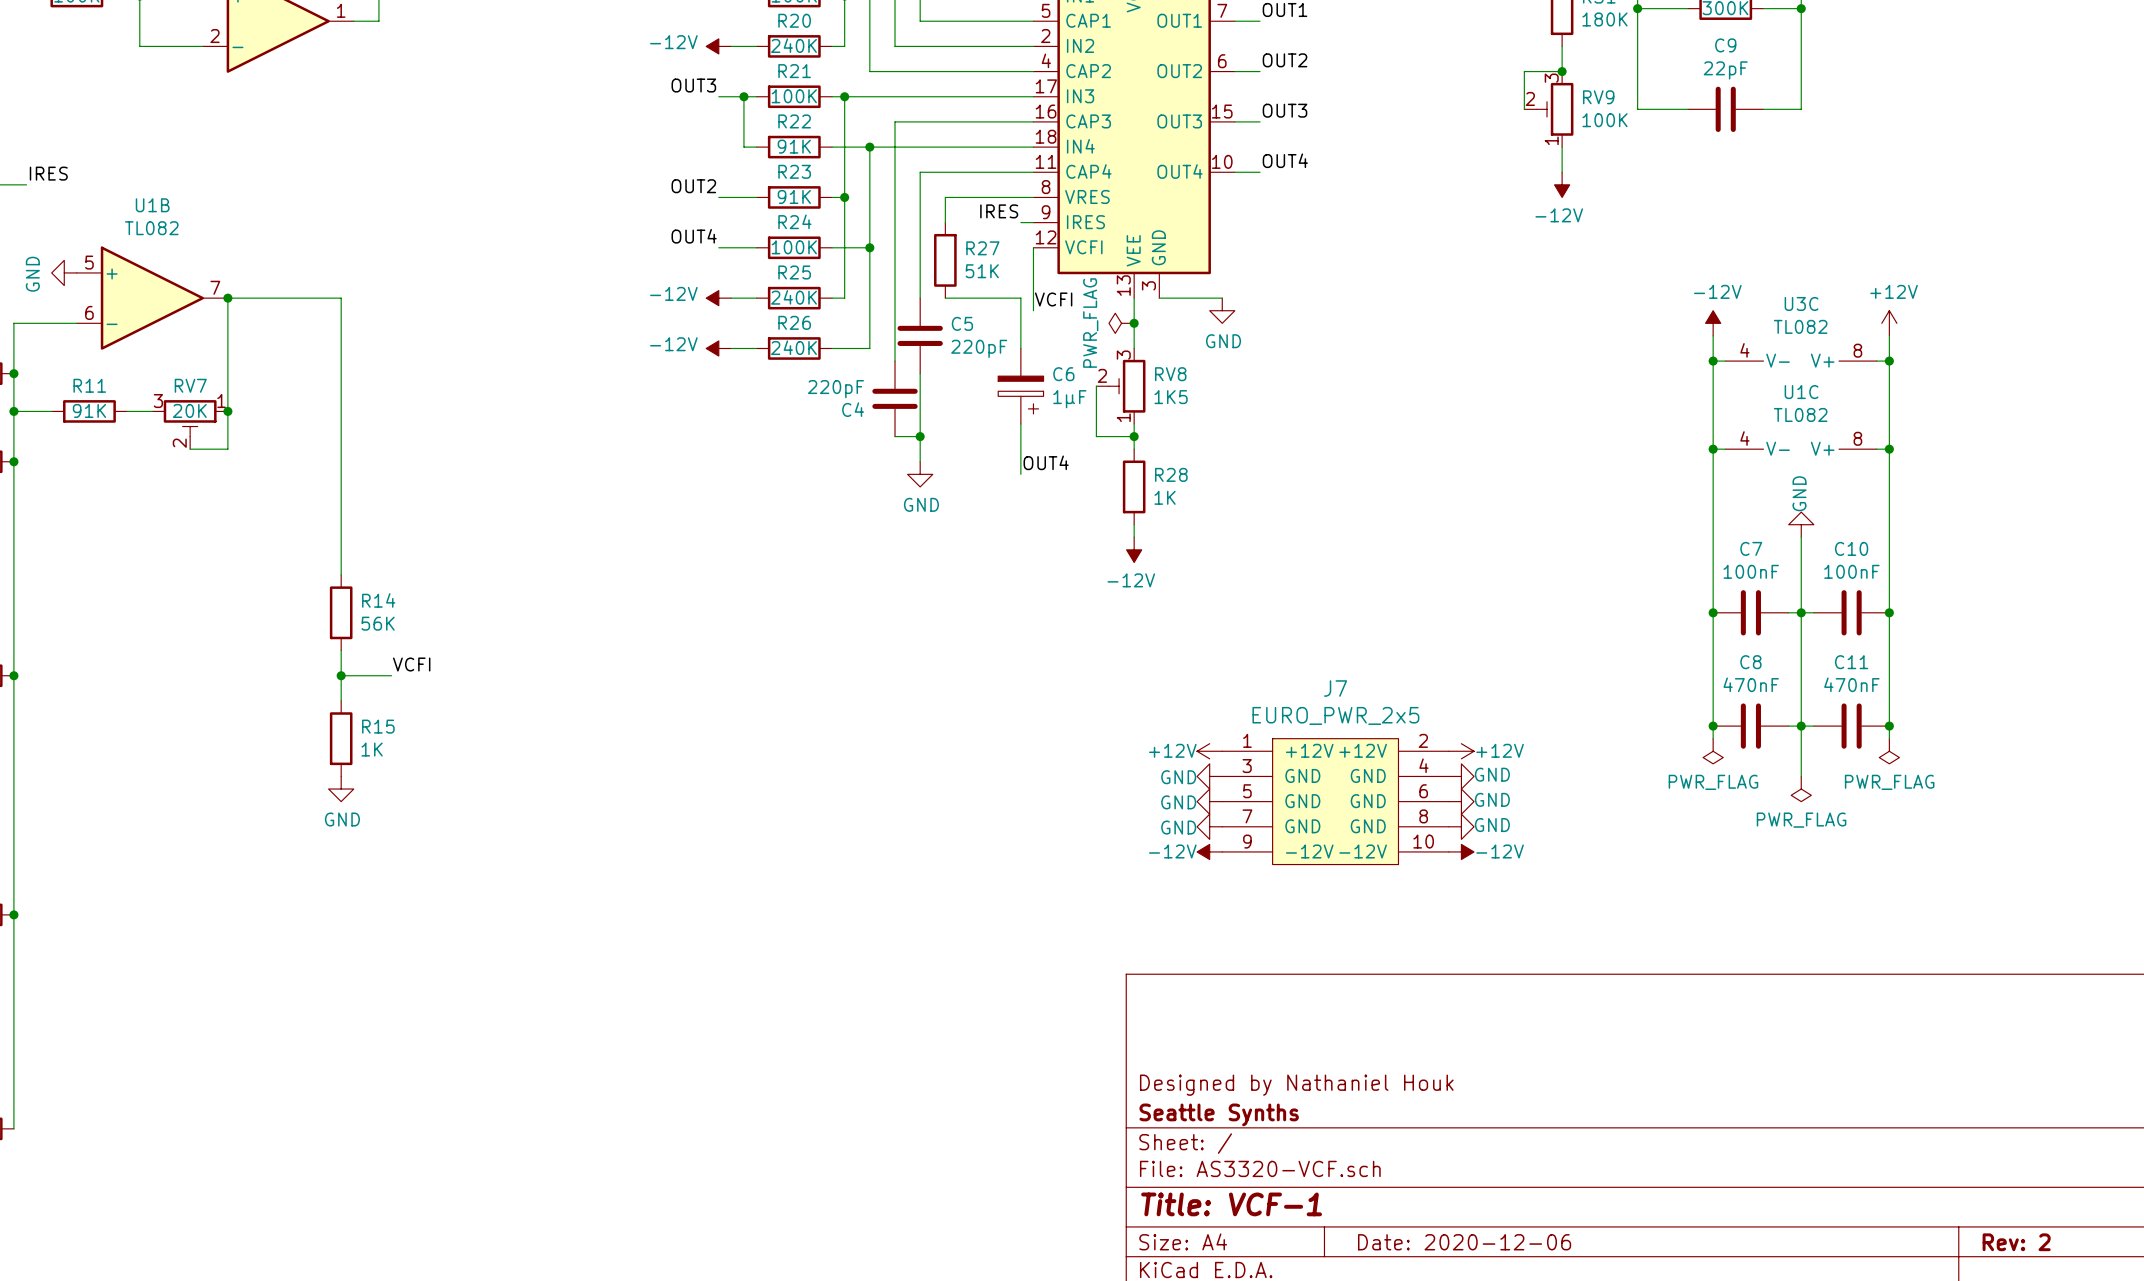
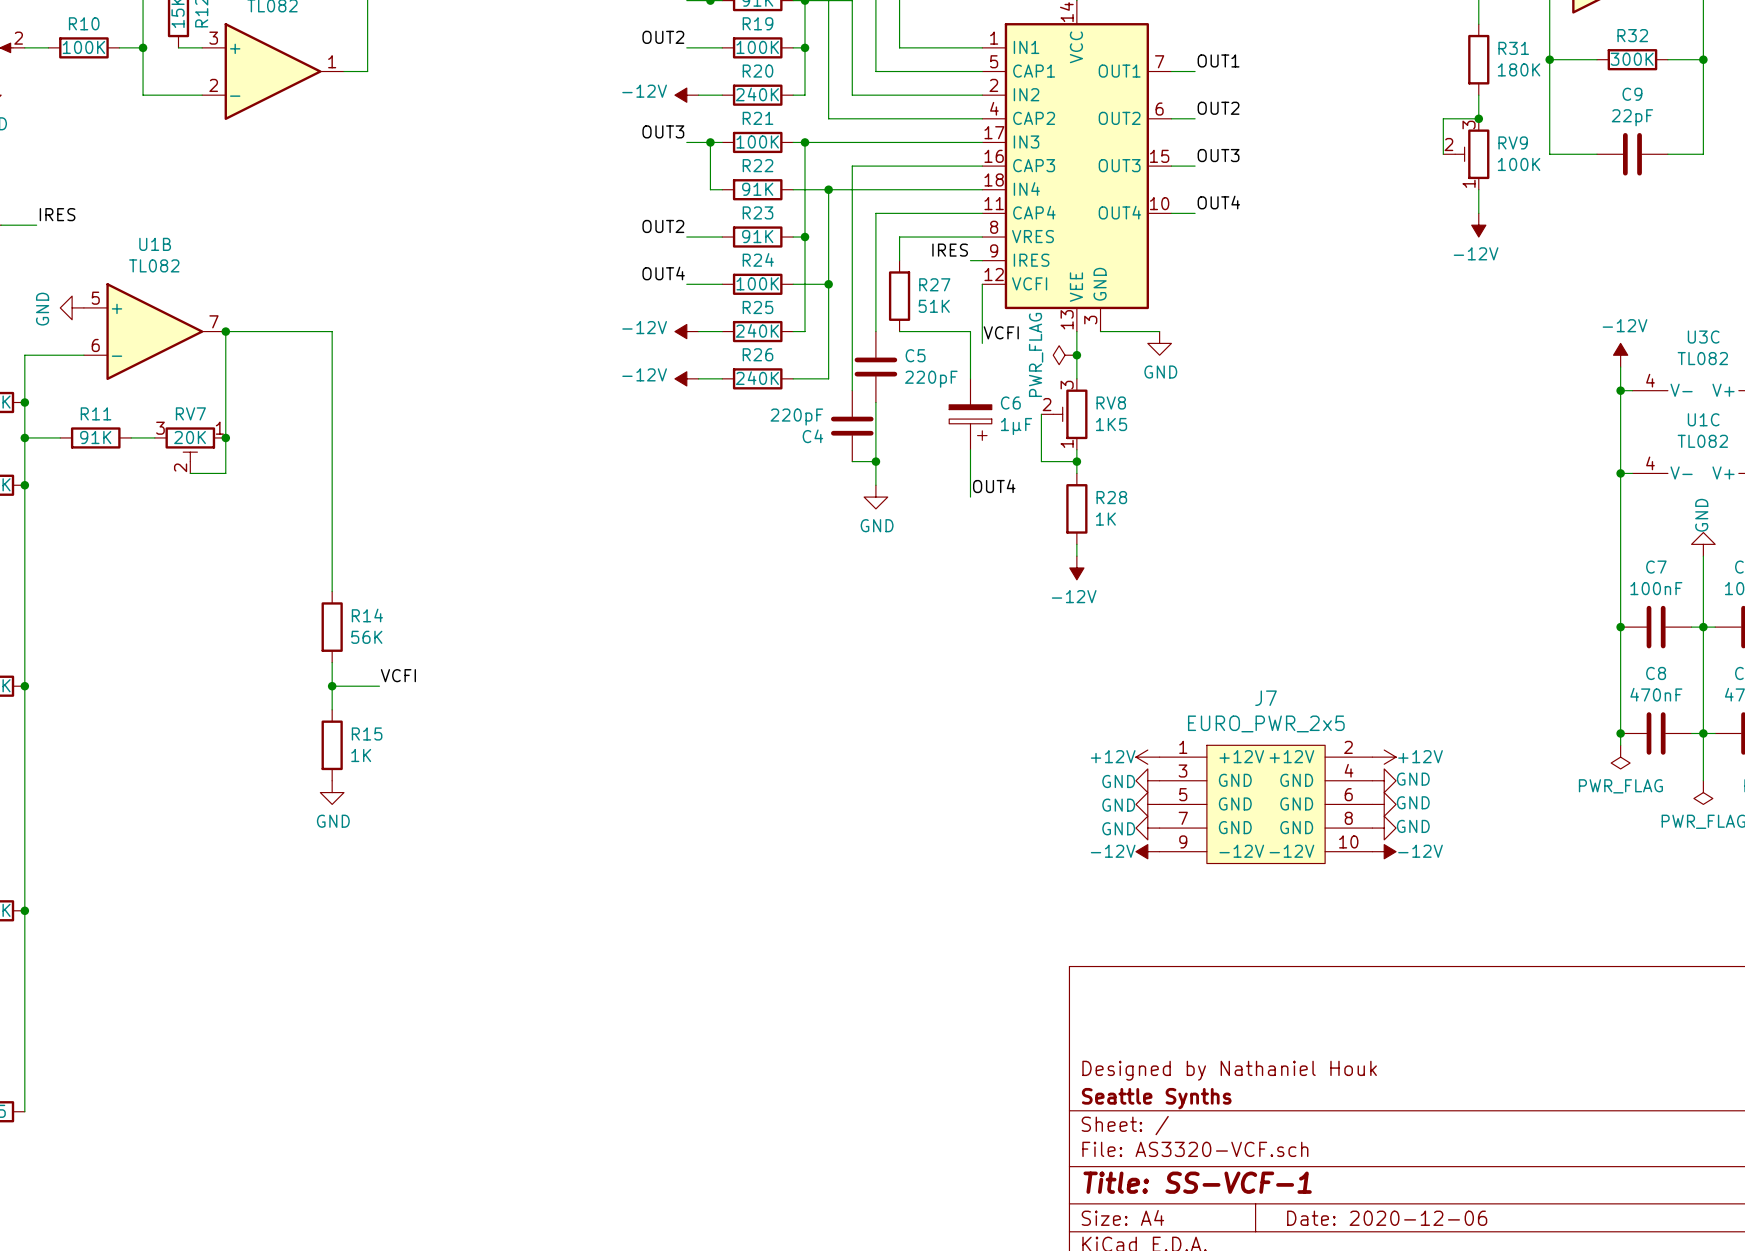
title block: Title: VCF-1 (1231, 1204) -> Title: SS-VCF-1 (1197, 1182)

